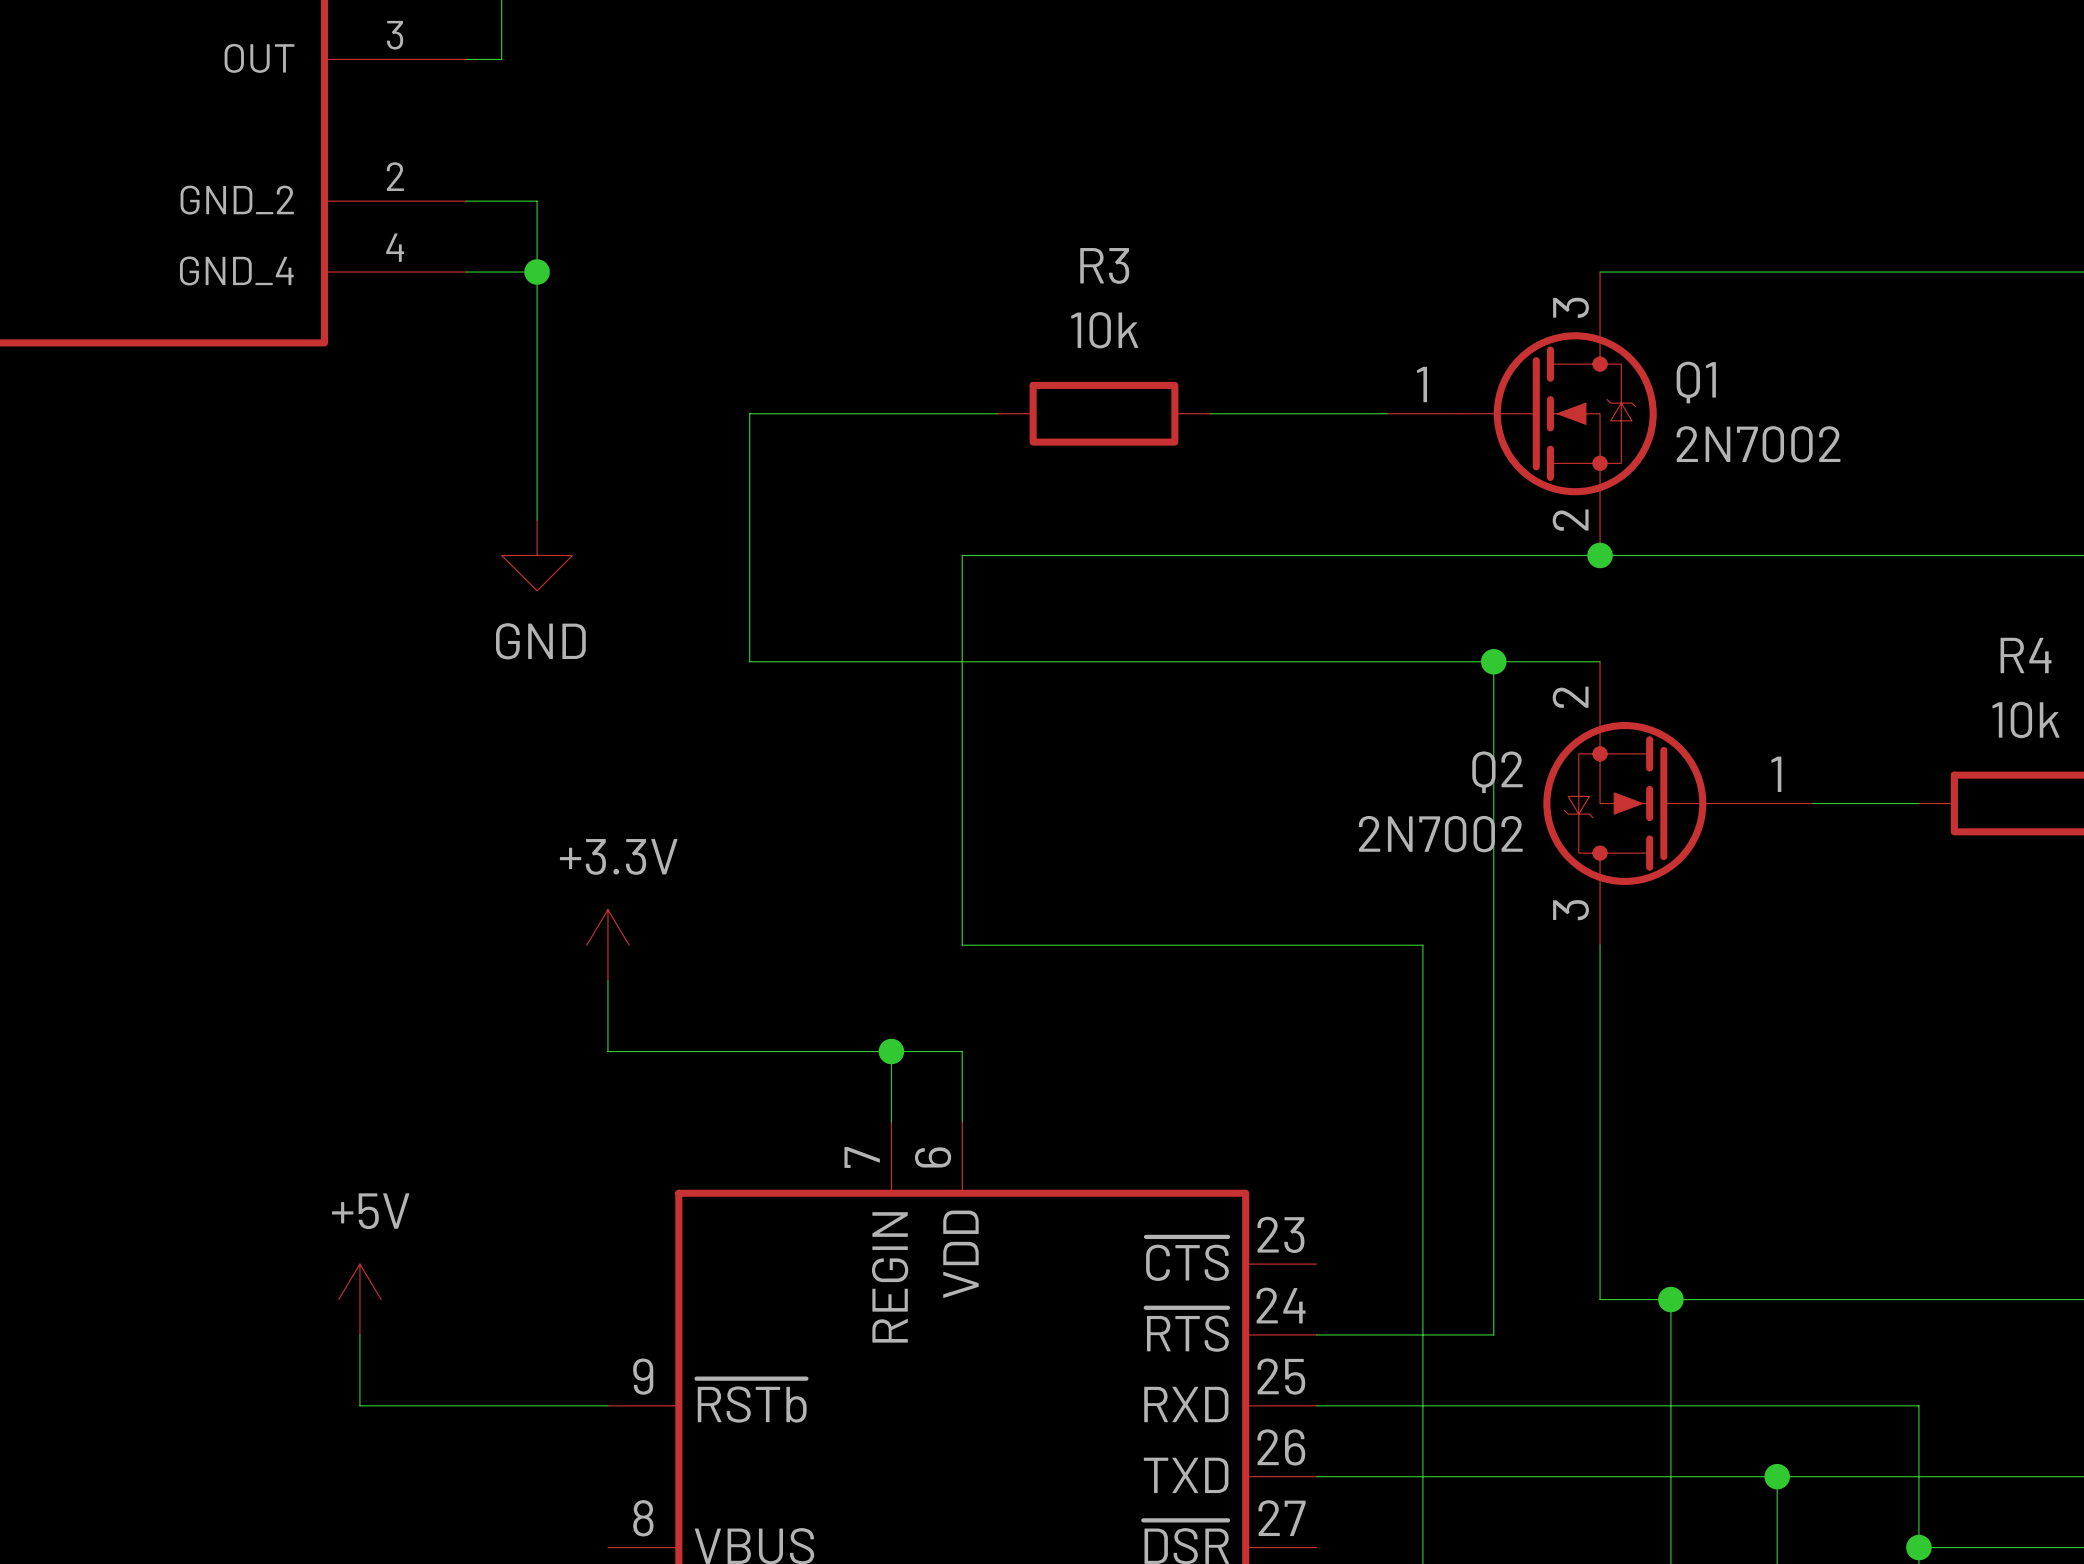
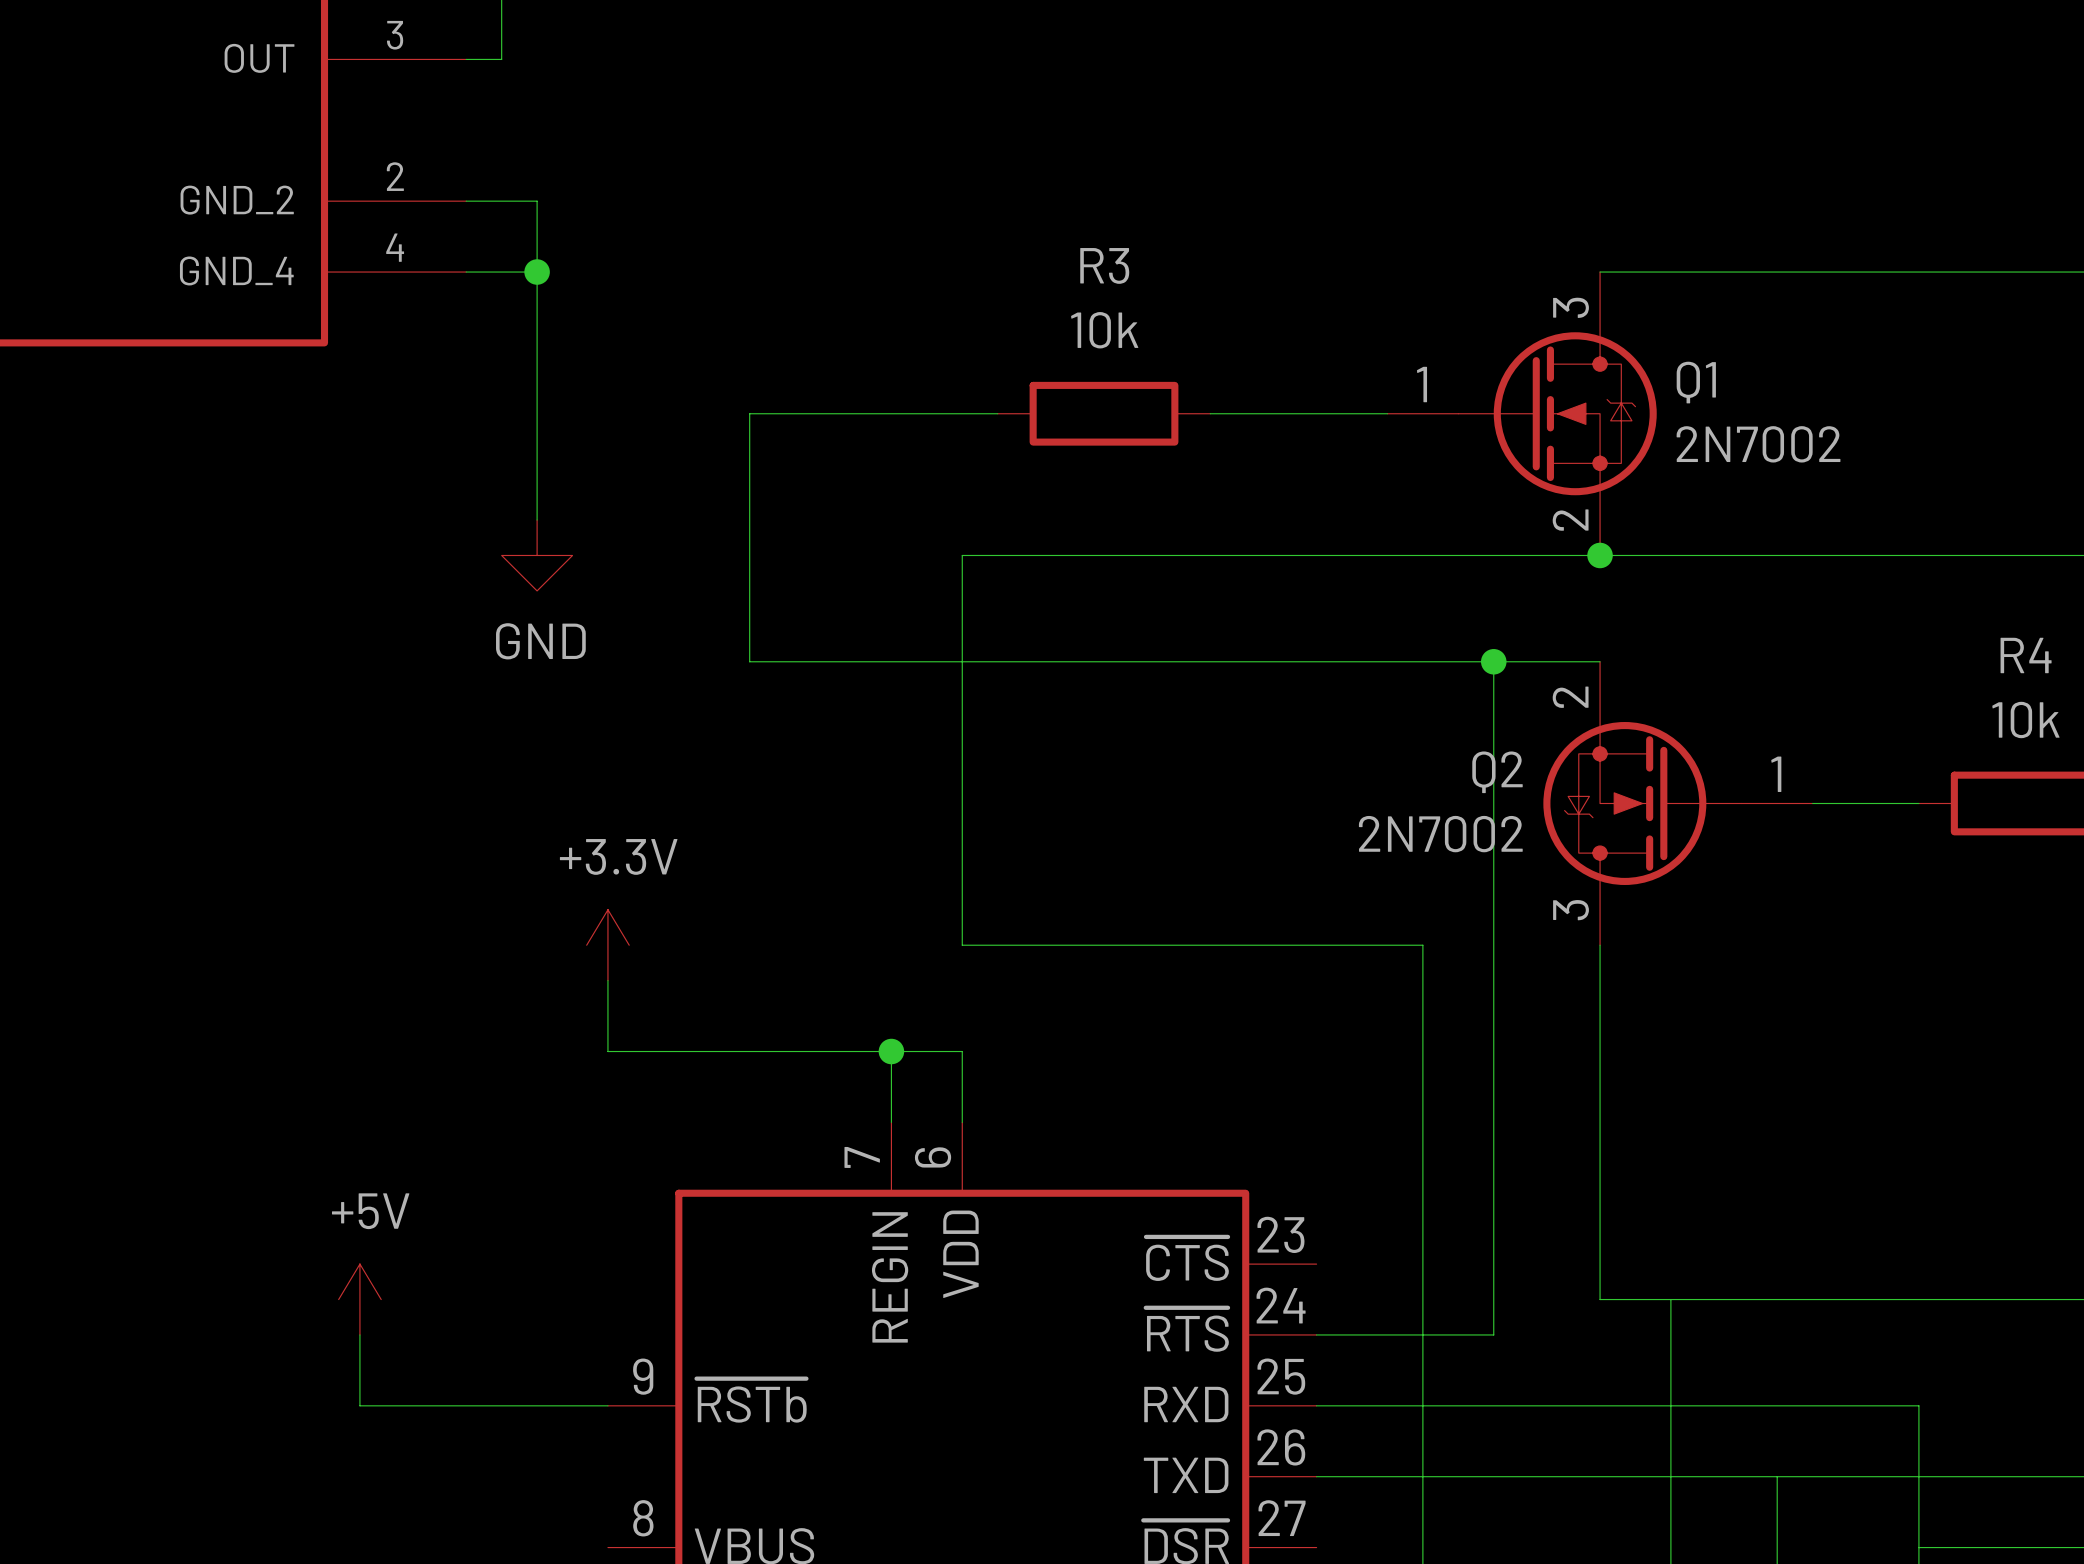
junction: (1670, 1299) -> none
junction: (1777, 1476) -> none
junction: (1918, 1547) -> none

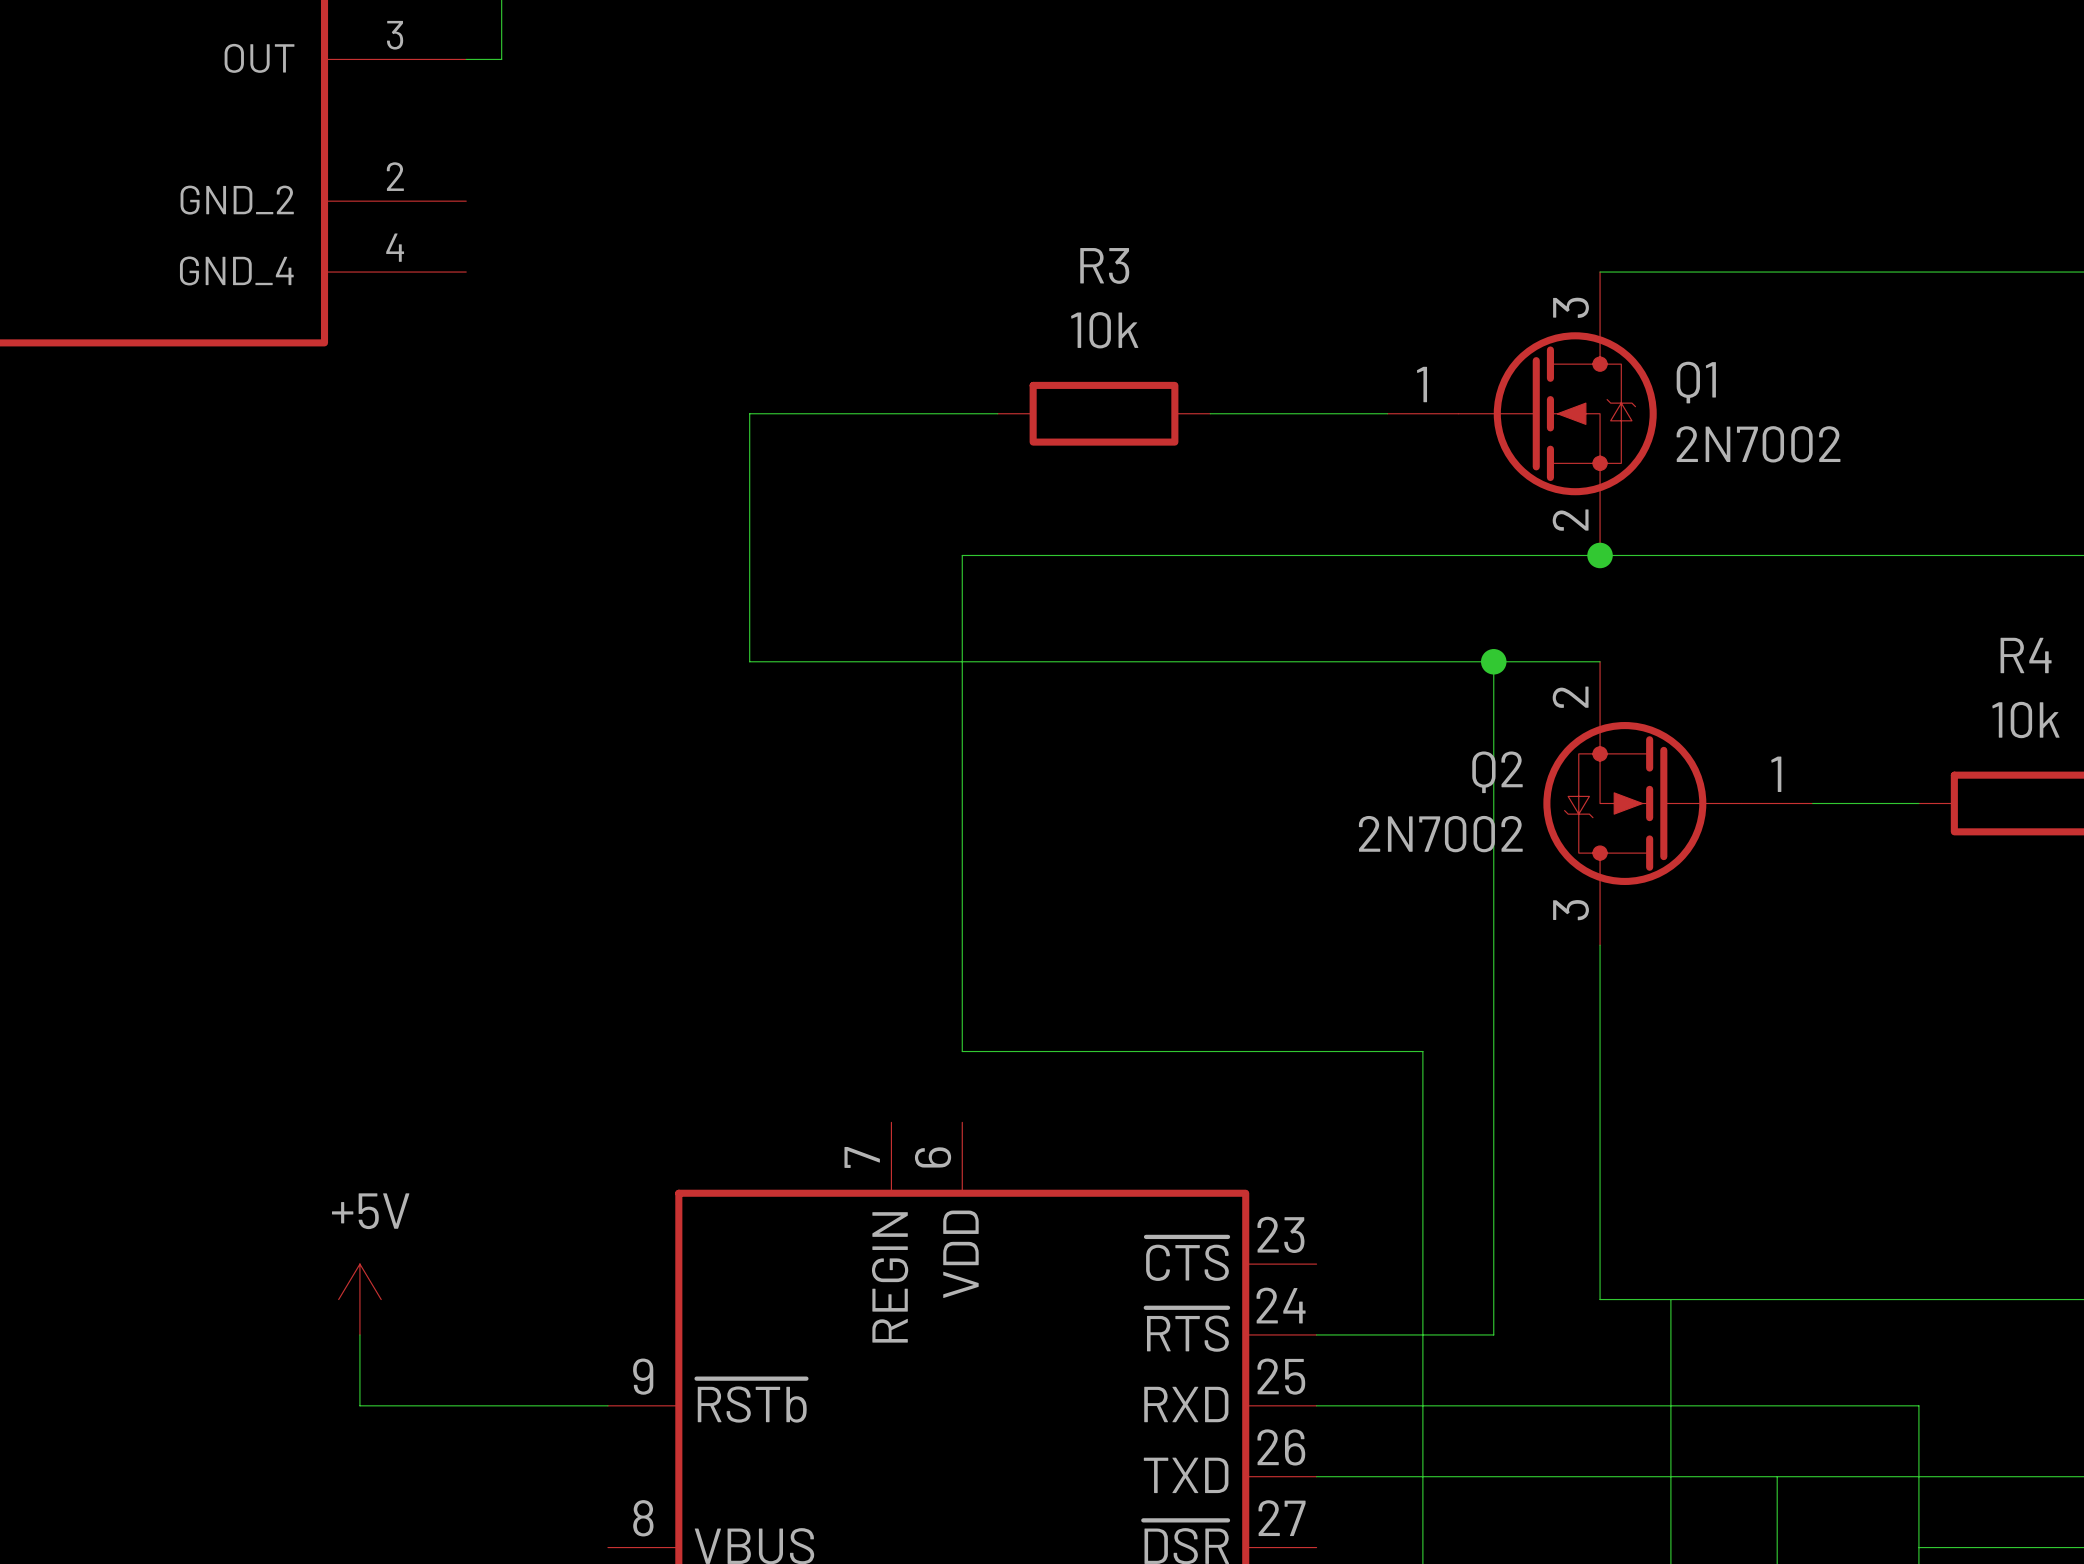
wire: (466, 201) (537, 201) (537, 520) -> none
wire: (466, 272) (537, 272) -> none
junction: (537, 272) -> none
power symbol: GND (537, 555) -> none
power symbol: +3.3V (607, 945) -> none
wire: (962, 945) (1422, 945) (1422, 1051) -> (962, 945) (962, 1051) (1422, 1051)
wire: (607, 980) (607, 1051) (962, 1051) (962, 1122) -> none
wire: (891, 1051) (891, 1122) -> none
junction: (891, 1051) -> none

